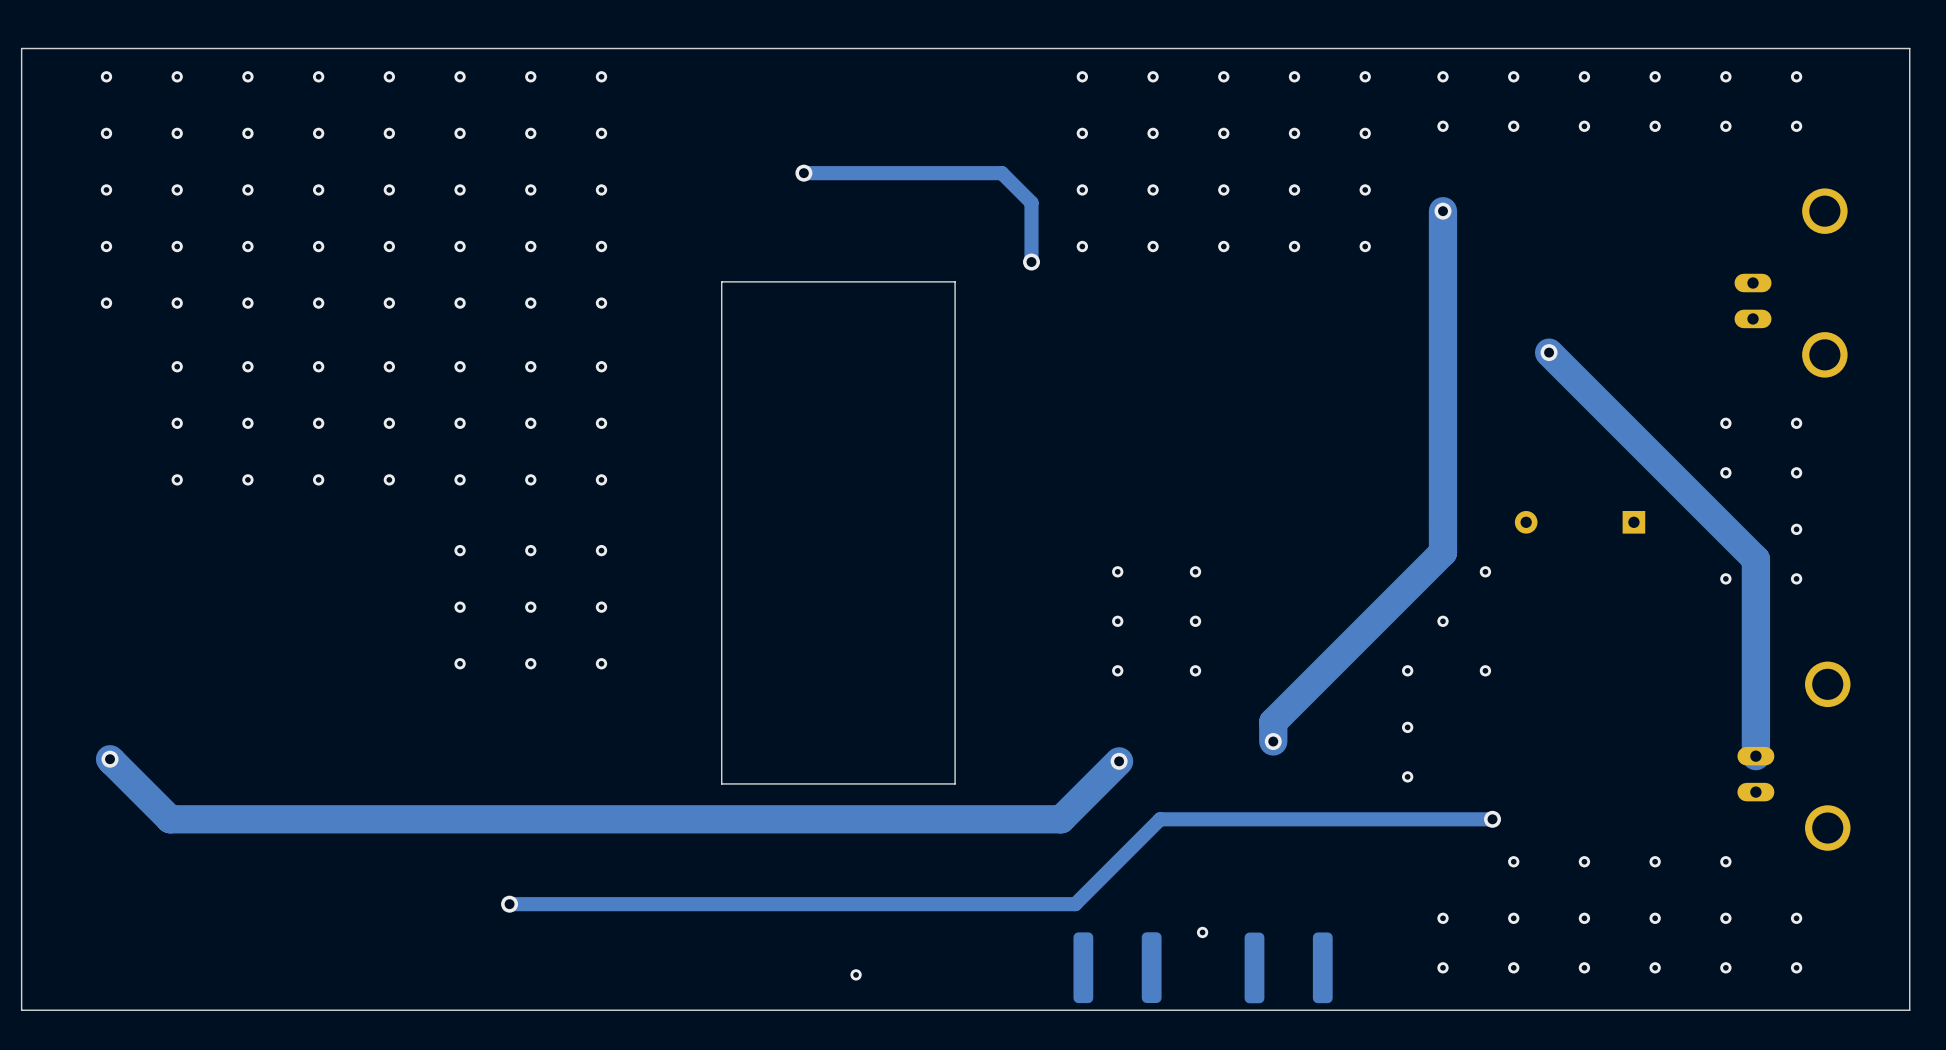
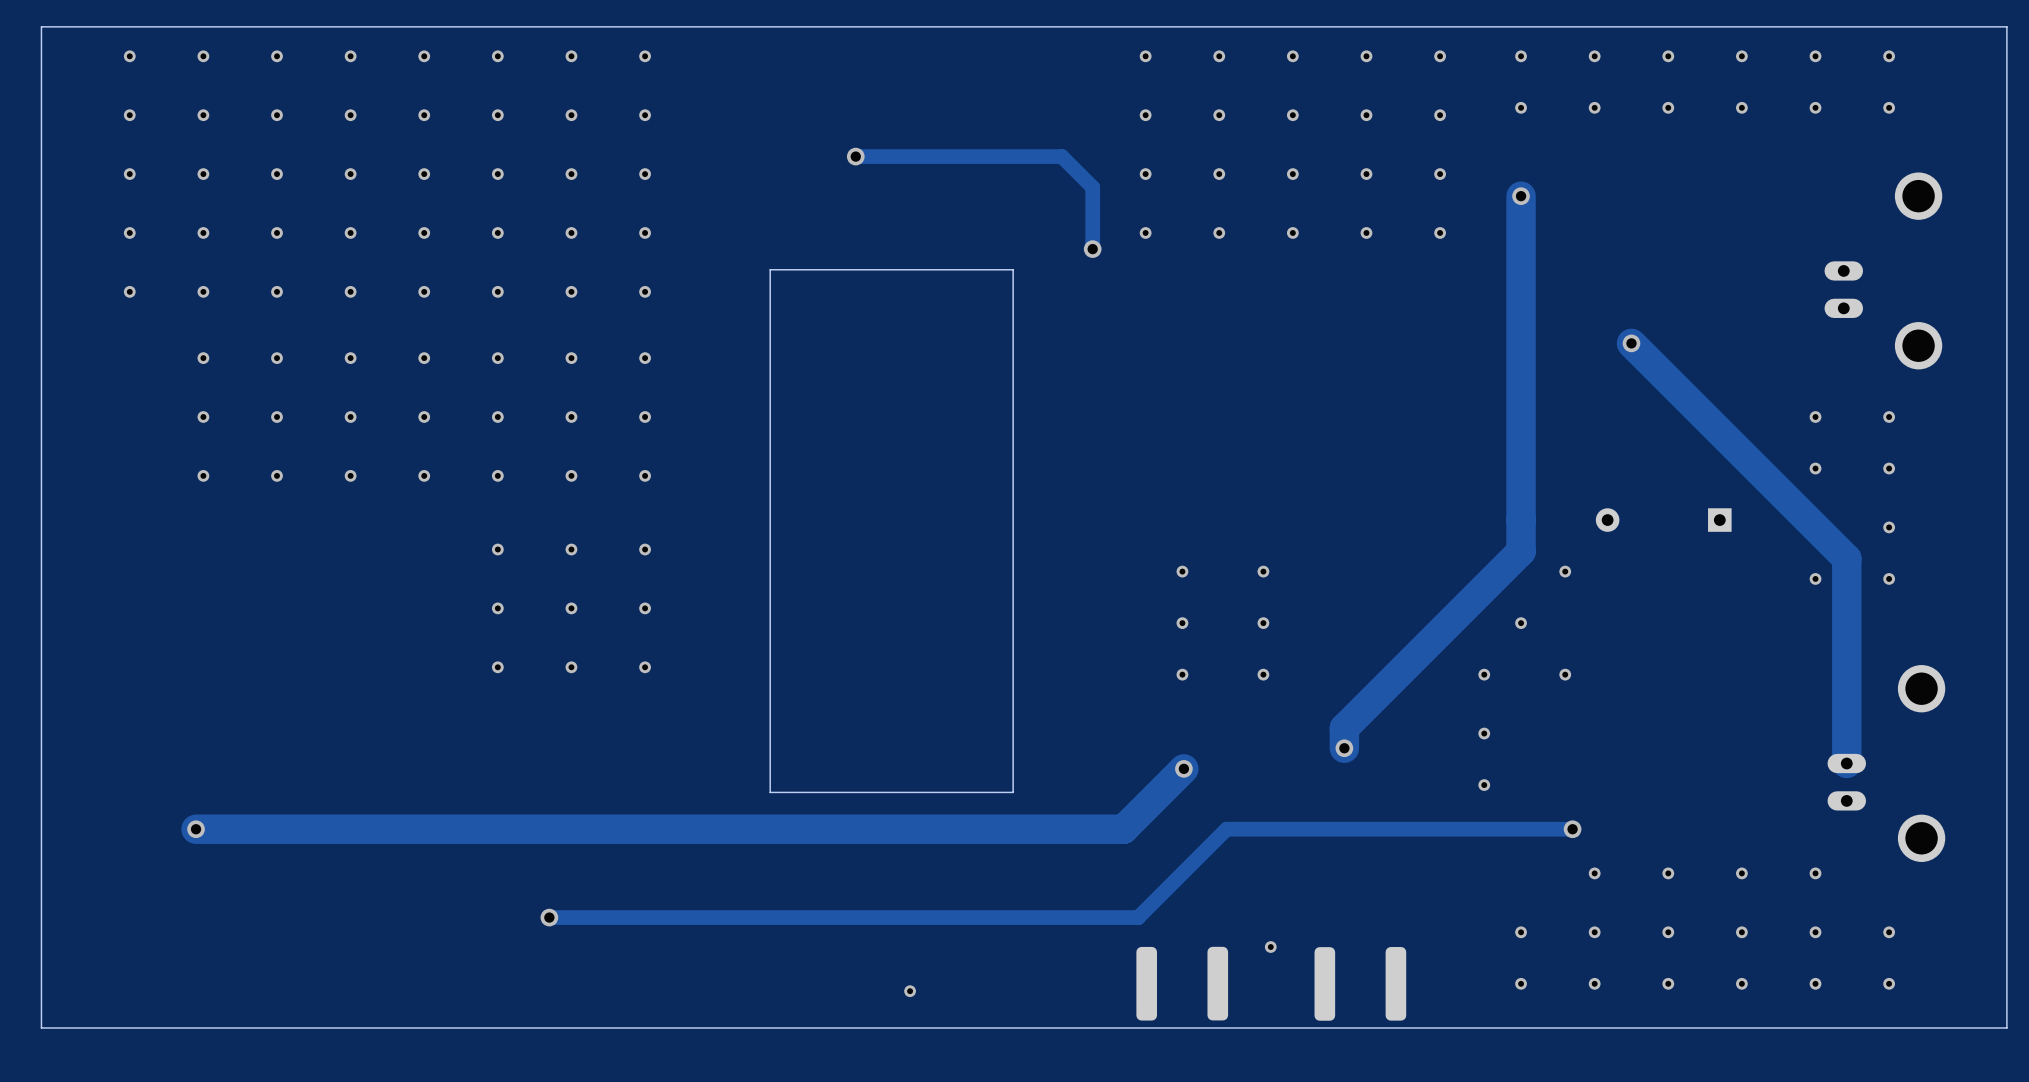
track: (110, 759) (170, 819) -> none
via: (110, 759) -> none
via: none -> (196, 829)

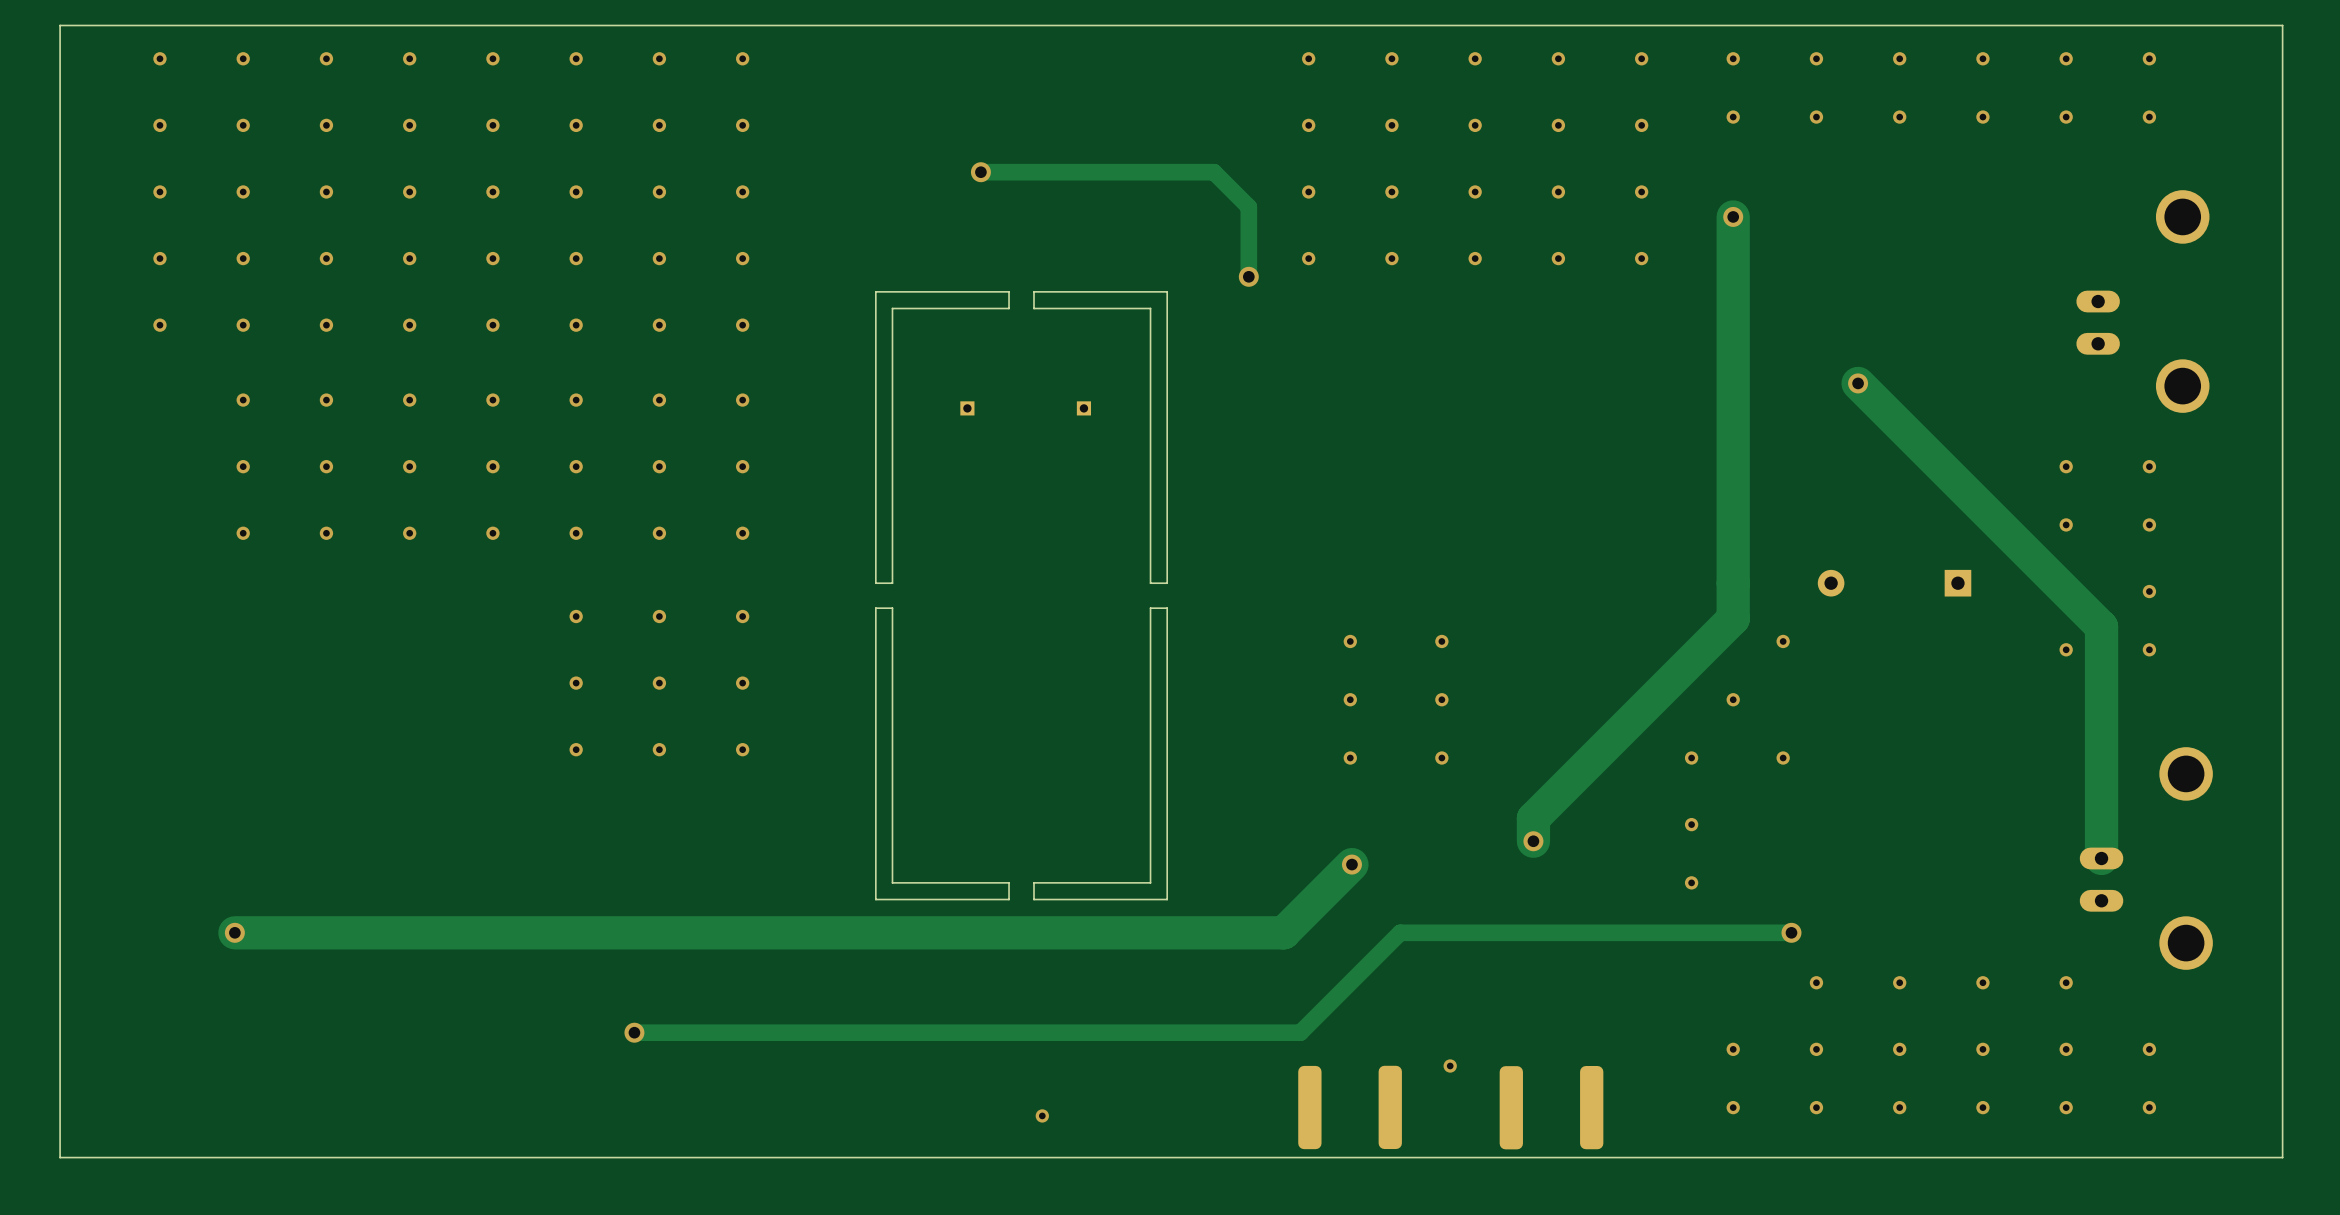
board edge: none -> (1009, 291) (1009, 308) (892, 308) (892, 583) (875, 583) (875, 291) (1009, 291)
board edge: none -> (1167, 291) (1167, 583) (1150, 583) (1150, 308) (1033, 308) (1033, 291) (1167, 291)
board edge: (1013, 269) (770, 269) (770, 792) (1013, 792) (1013, 269) -> none
part: none -> (967, 408)
part: none -> (1083, 408)
board edge: none -> (892, 608) (875, 608) (875, 899) (1009, 899) (1009, 882) (892, 882) (892, 608)
board edge: none -> (1167, 608) (1150, 608) (1150, 882) (1033, 882) (1033, 899) (1167, 899) (1167, 608)

